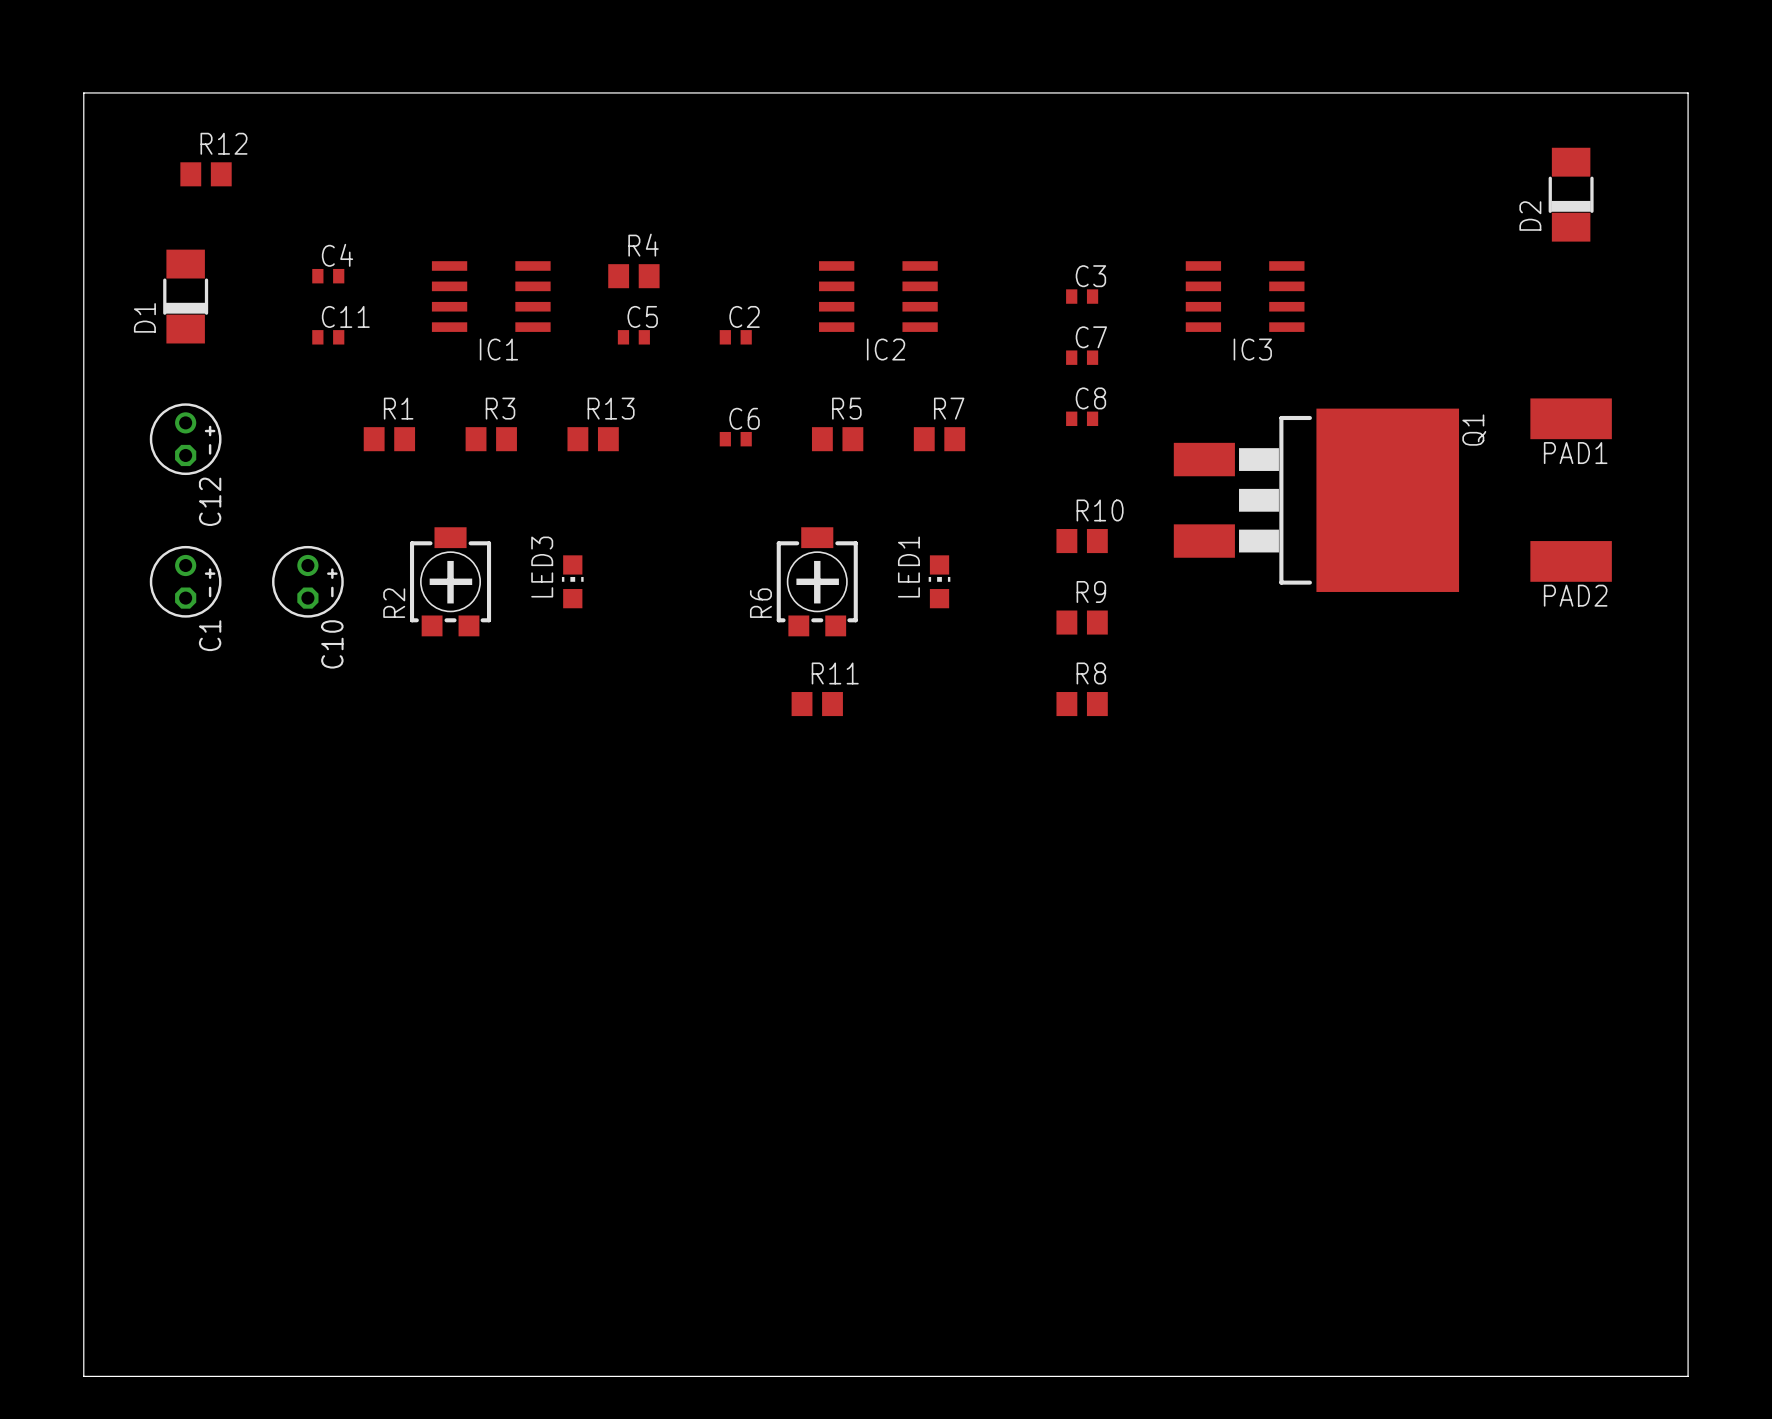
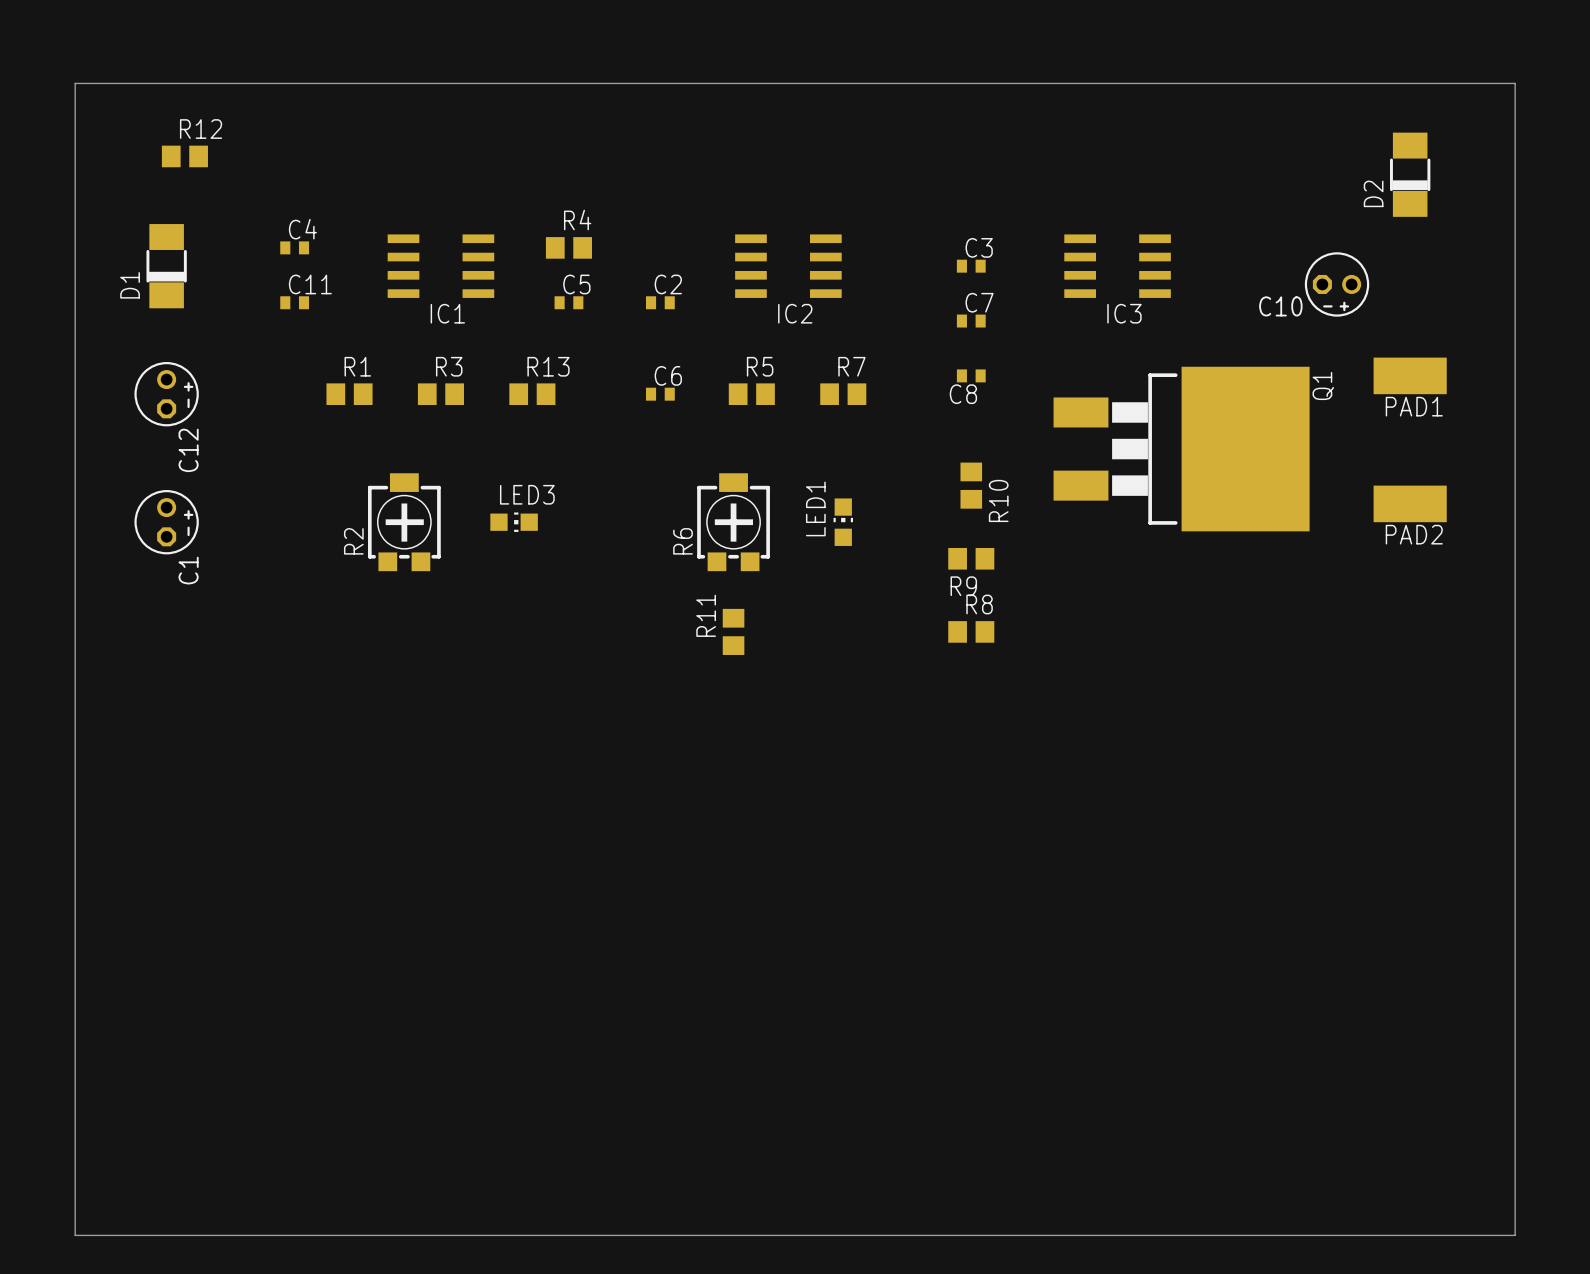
C8 name position: C8 (1090, 398) -> C8 (963, 394)
R10 rotation: 0° (1082, 541) -> 90° clockwise (971, 485)
C10 rotation: 0° (307, 581) -> 90° clockwise (1337, 284)
C10 position: (307, 581) -> (1337, 284)
LED3 rotation: 0° (572, 581) -> 90° clockwise (514, 522)
R9 name position: R9 (1091, 591) -> R9 (963, 586)
R11 name position: R11 (835, 673) -> R11 (706, 615)
R11 rotation: 0° (817, 704) -> 90° clockwise (733, 631)

